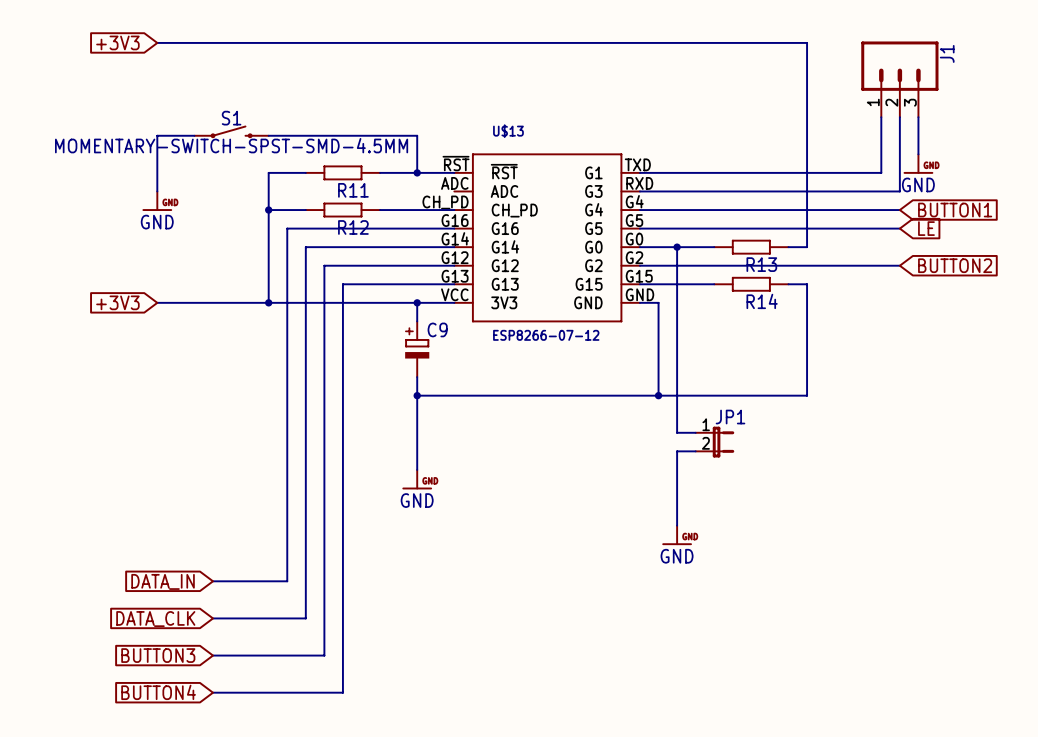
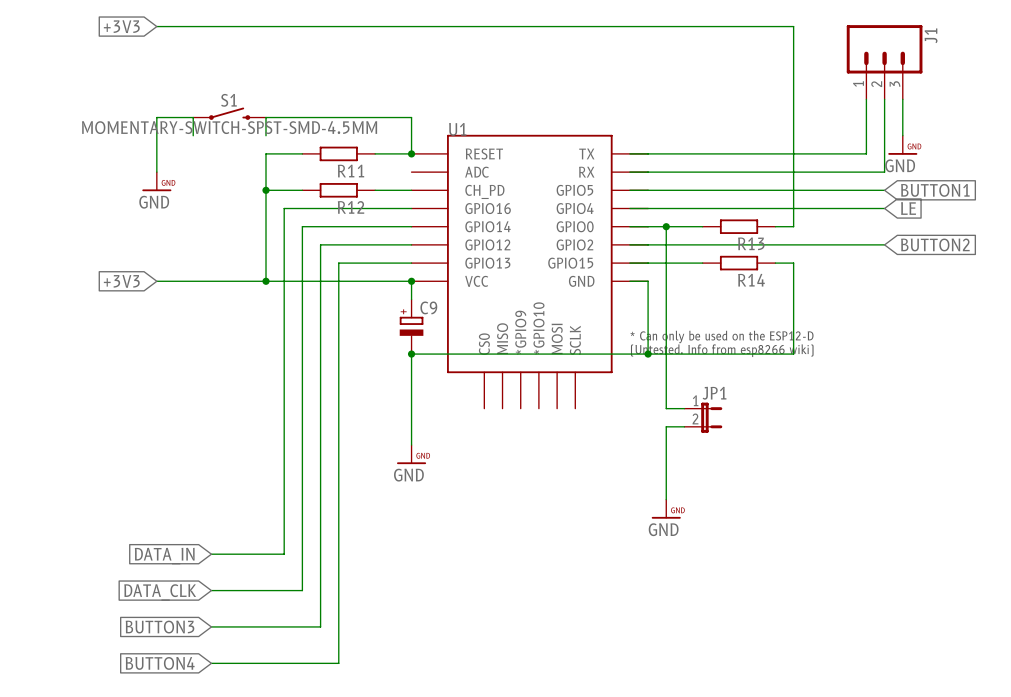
wire: none -> (193, 117) (193, 135)
wire: none -> (266, 117) (266, 135)
U$13: ESP8266-07-12 (547, 237) -> none
U1: none -> (529, 271)
wire: (658, 377) (658, 395) -> none
wire: (807, 377) (807, 395) (417, 395) -> (793, 354) (411, 354)
junction position: (417, 395) -> (411, 354)
junction position: (658, 395) -> (648, 354)

